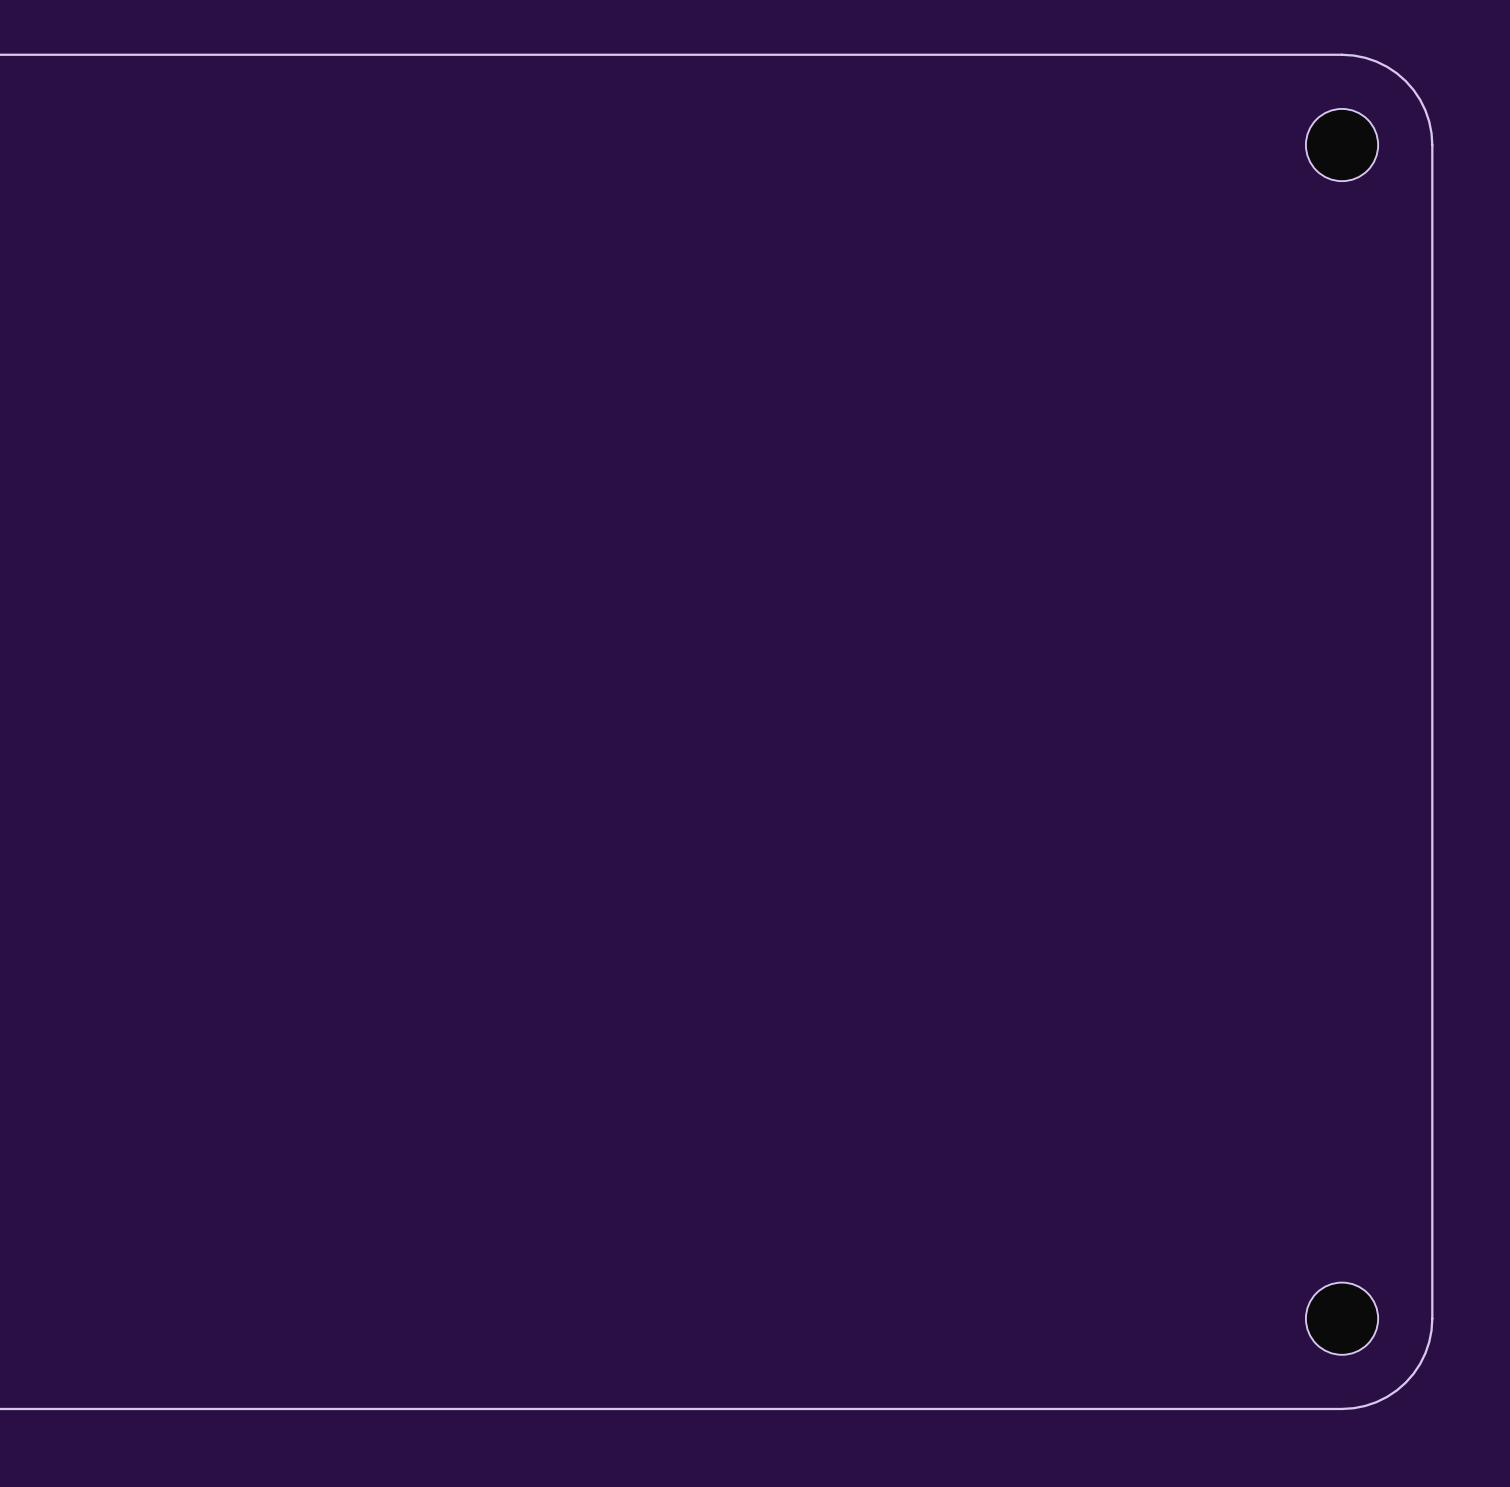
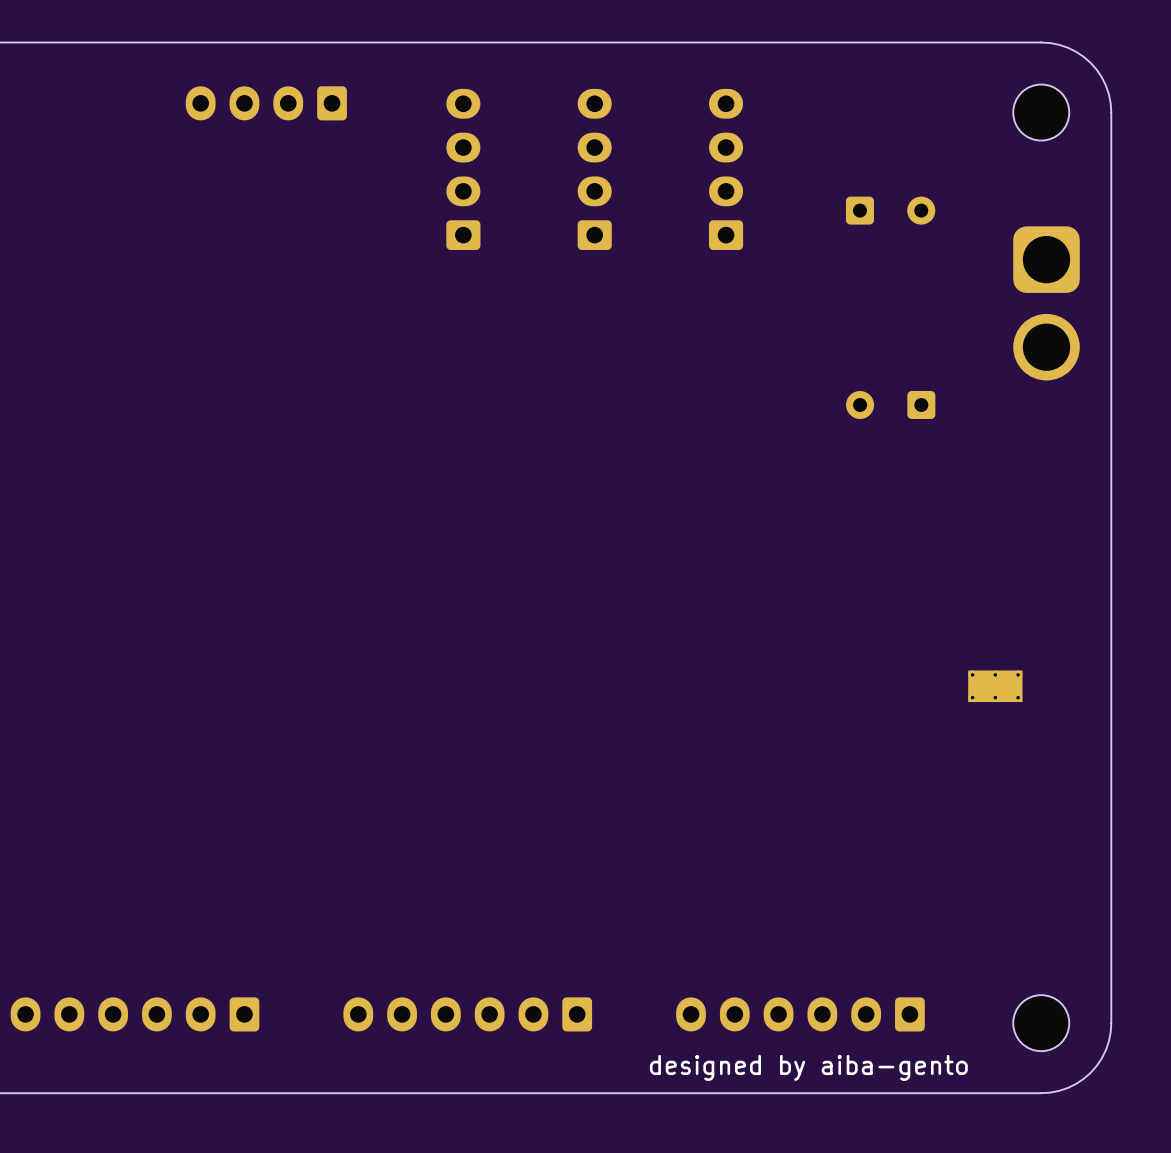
part: none -> (266, 103)
part: none -> (463, 169)
part: none -> (594, 169)
part: none -> (726, 169)
part: none -> (890, 210)
part: none -> (1046, 303)
part: none -> (890, 404)
part: none -> (995, 686)
part: none -> (135, 1014)
part: none -> (467, 1014)
part: none -> (800, 1014)
text: none -> designed by aiba-gento (808, 1067)

